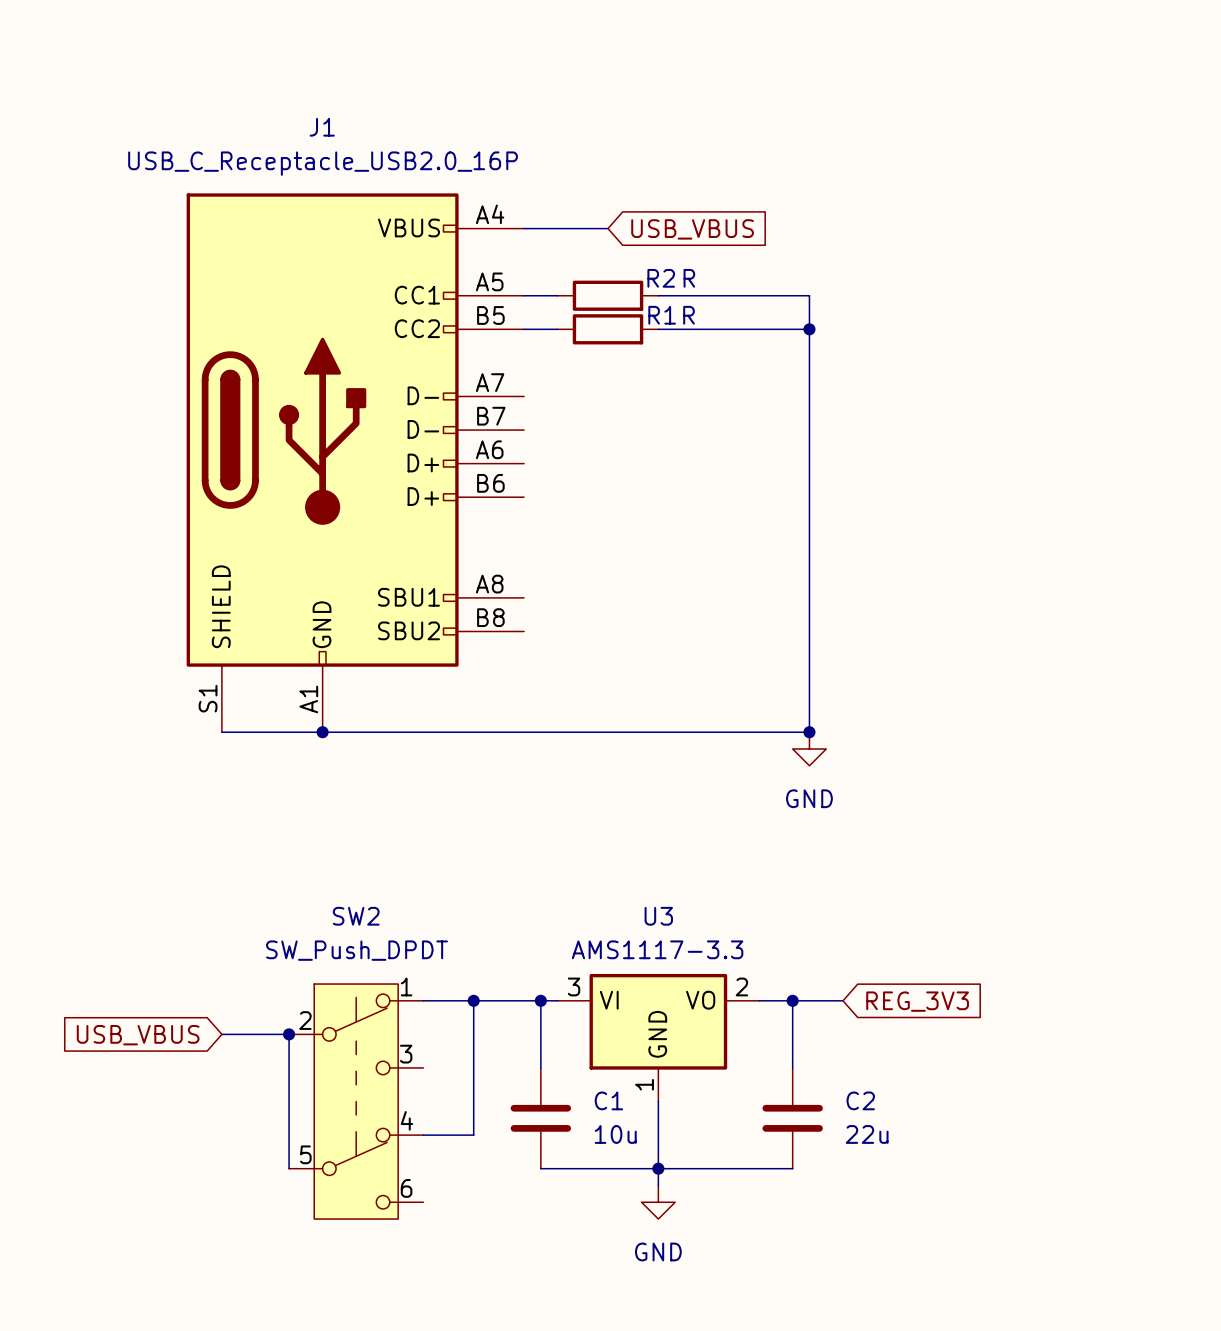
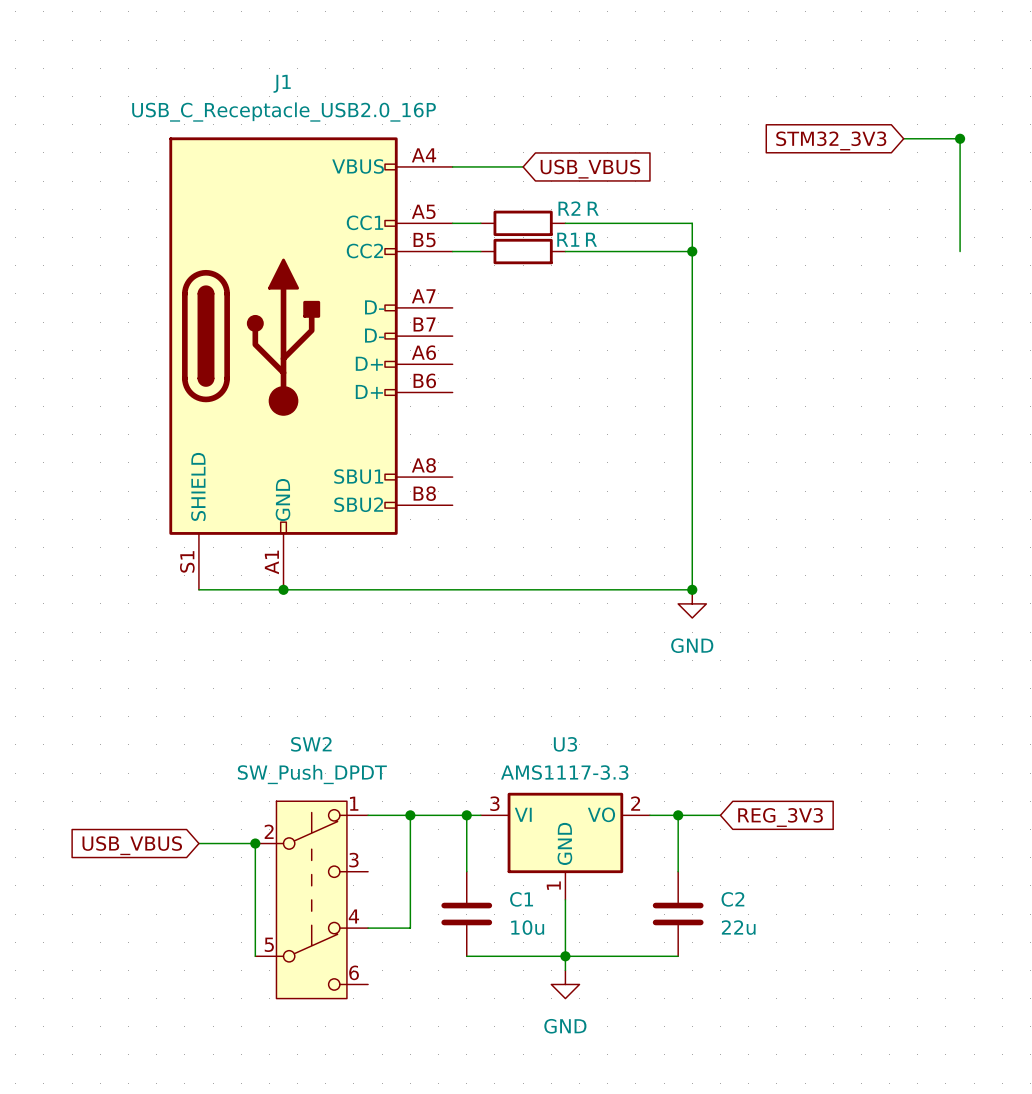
global label: none -> STM32_3V3 (831, 140)
wire: none -> (903, 138) (960, 138) (960, 251)
junction: none -> (960, 138)

